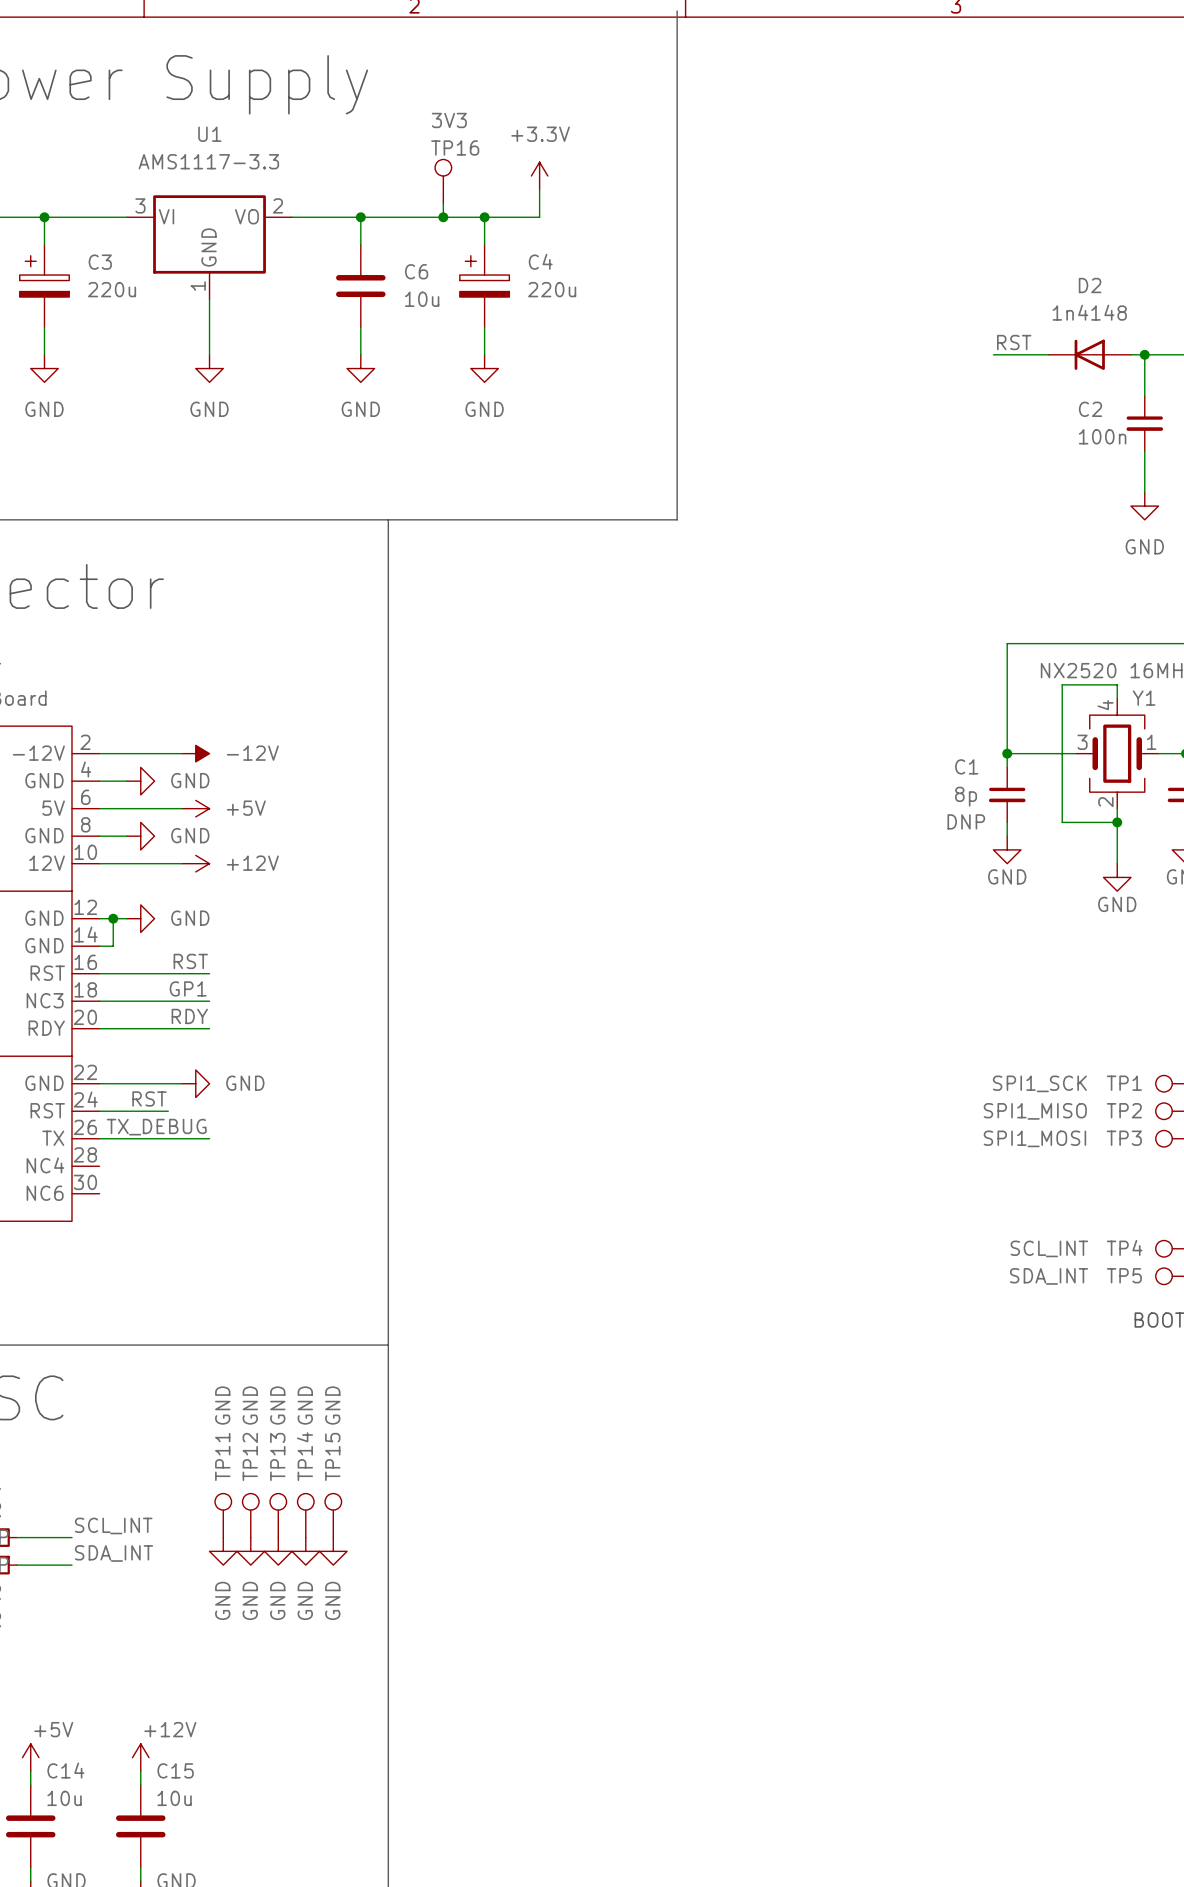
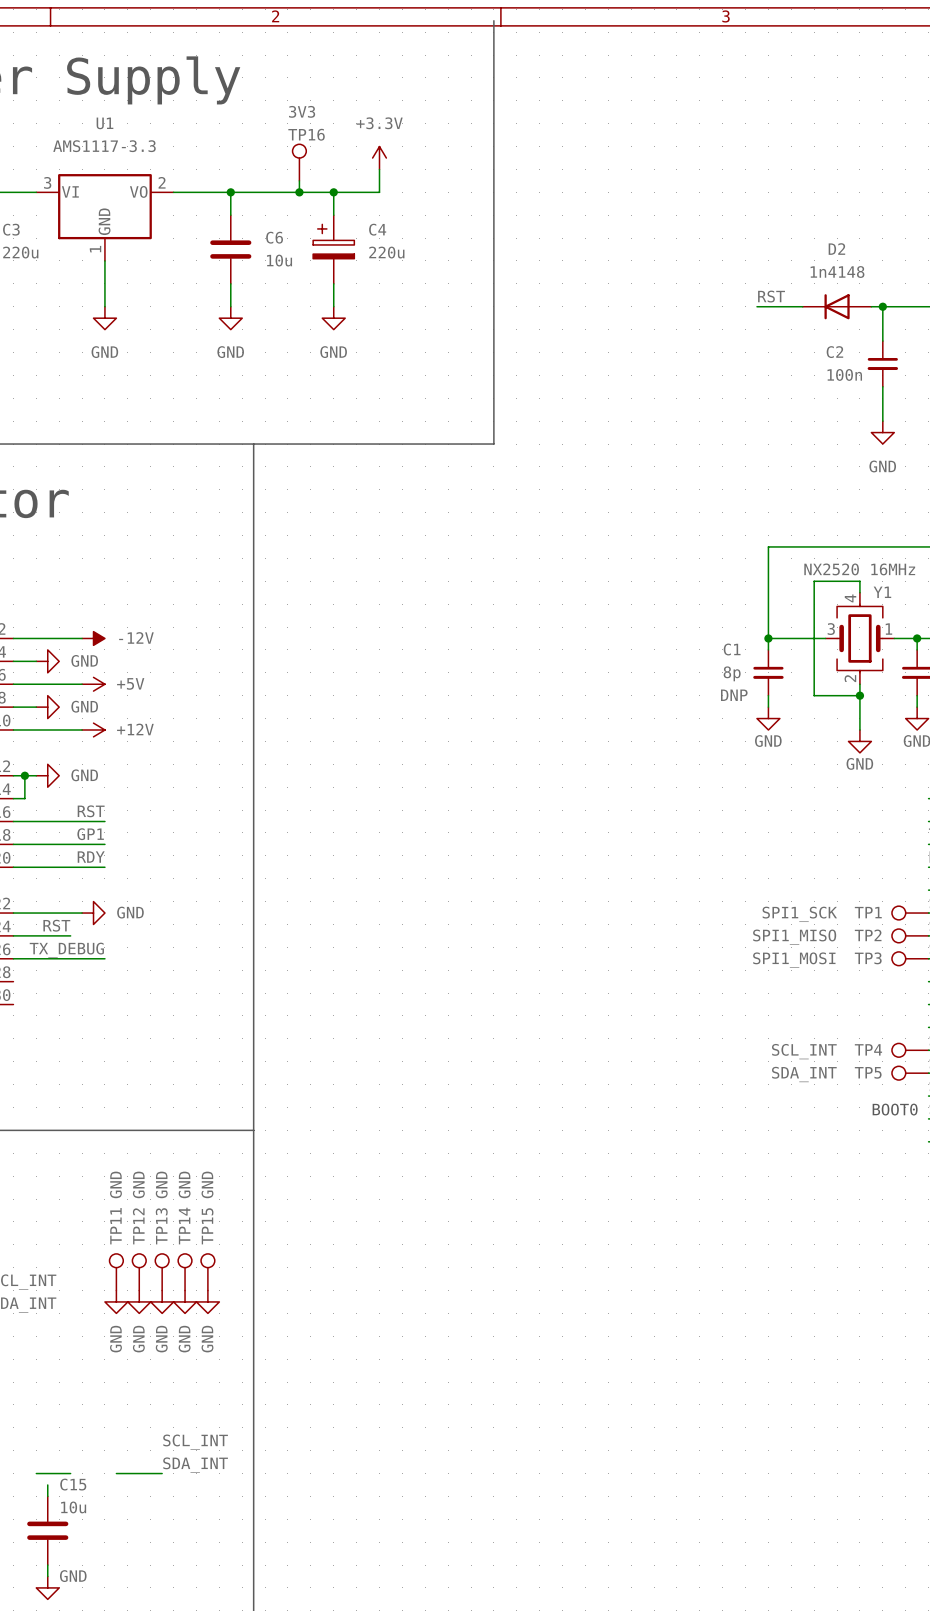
label: none -> SCL_INT (195, 1442)
label: none -> SDA_INT (195, 1465)
wire: none -> (36, 1473) (70, 1473)
power symbol: +12V (140, 1757) -> none
wire: none -> (116, 1473) (162, 1473)

